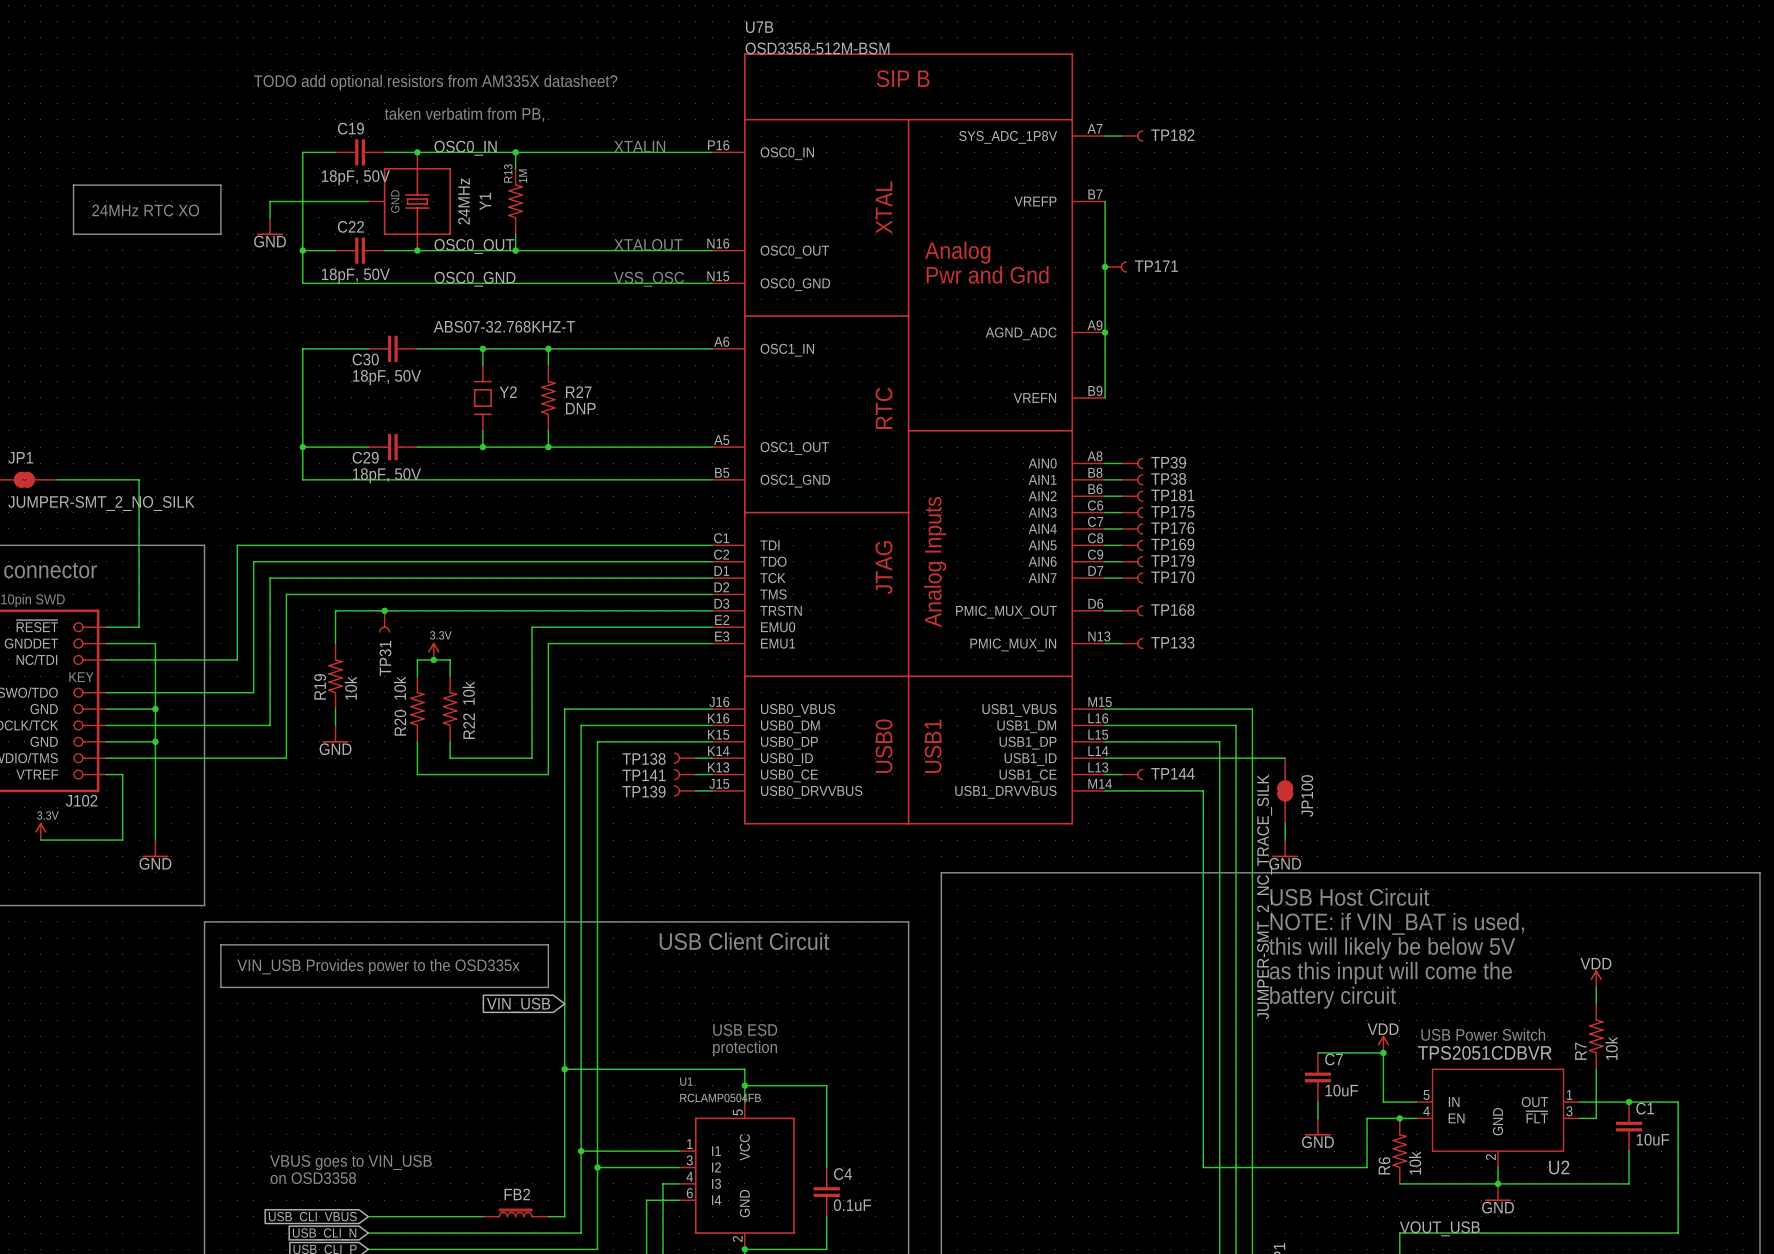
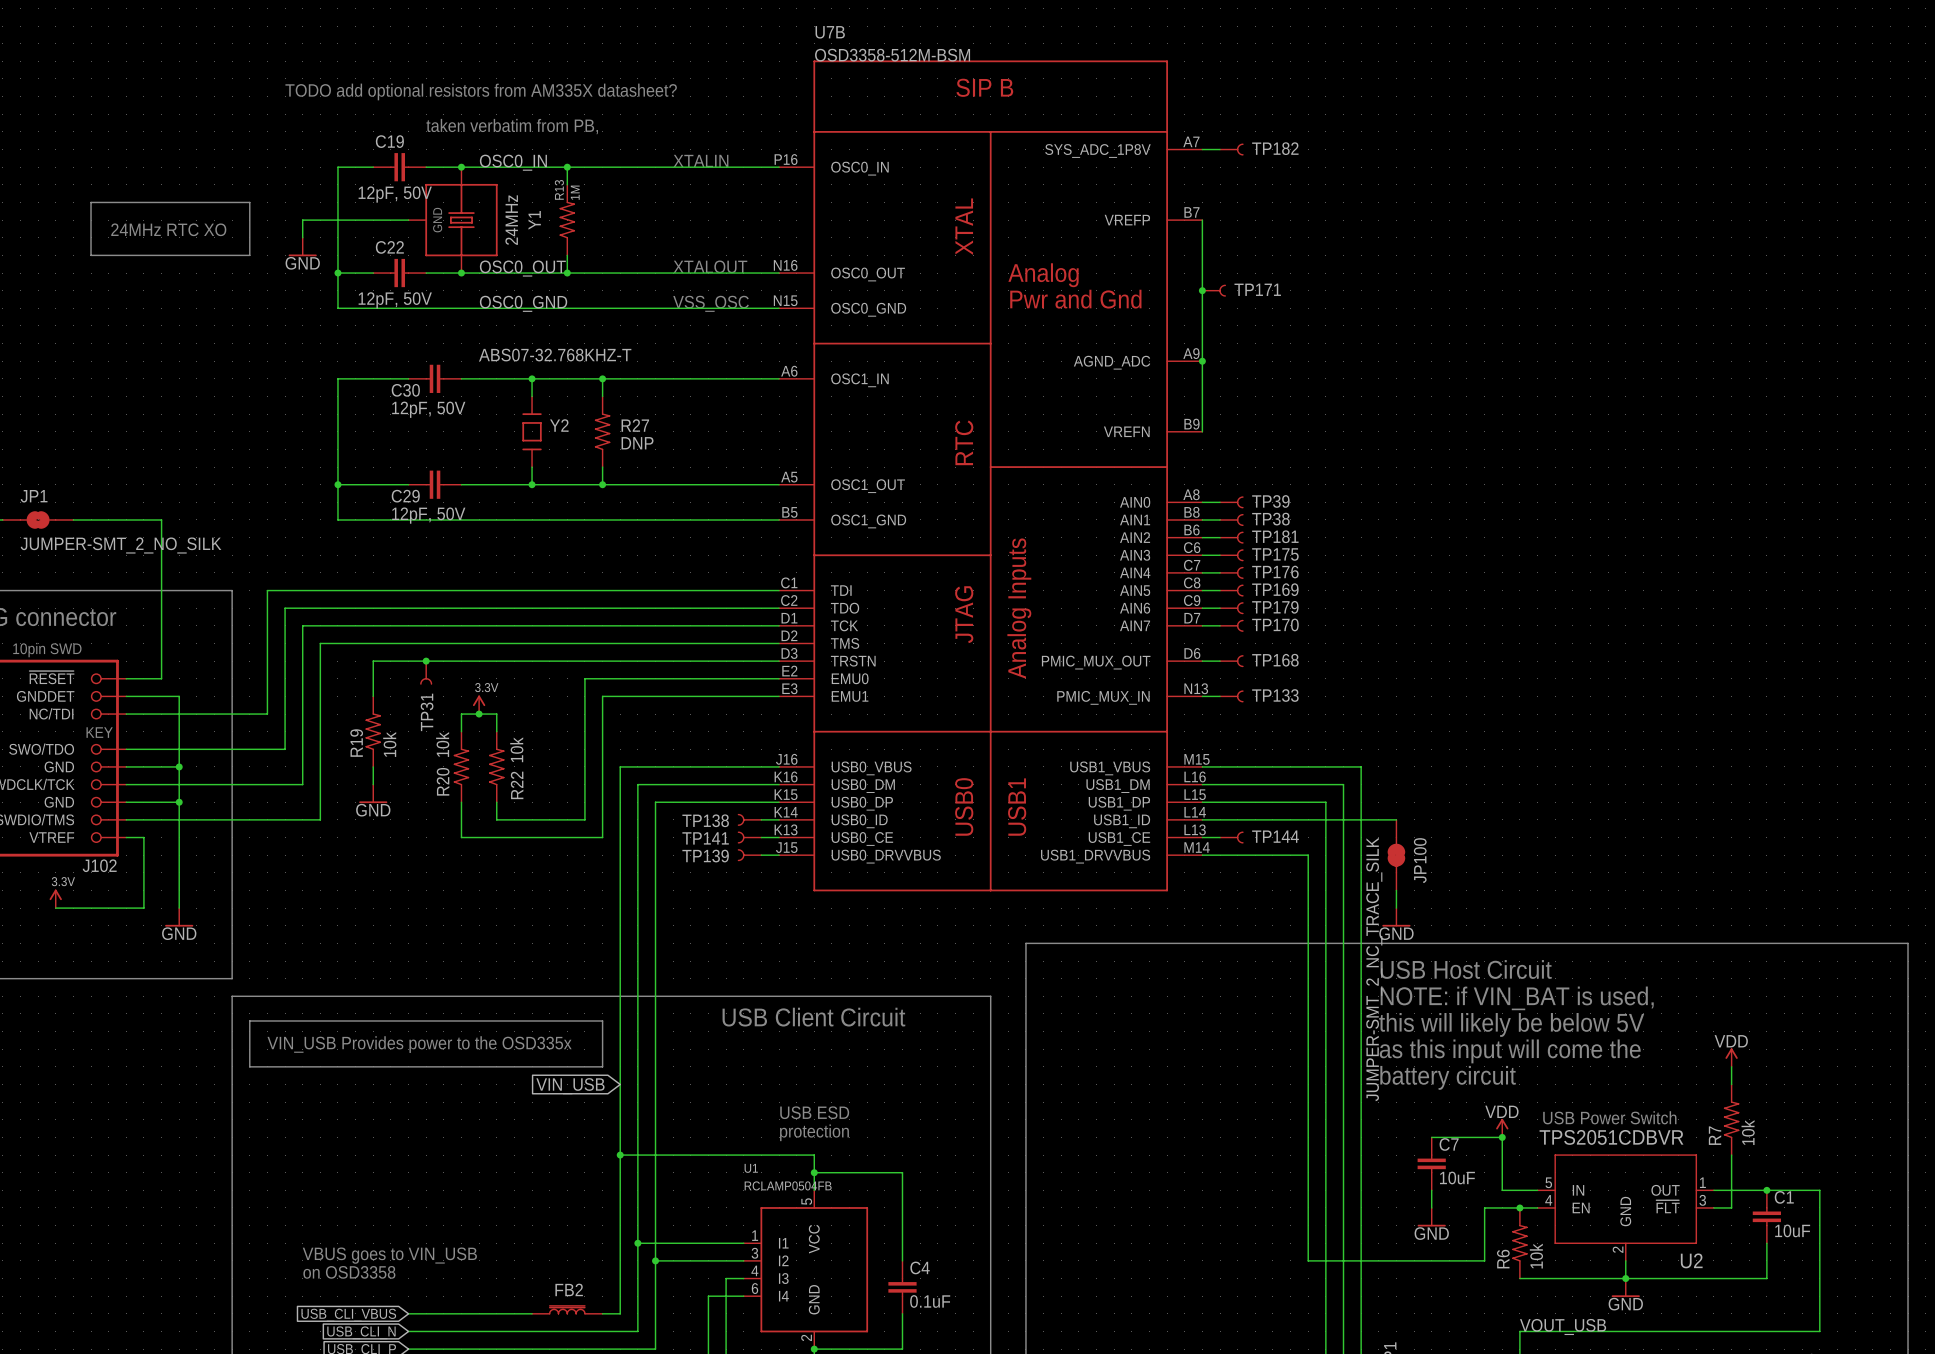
C19 value: 18pF, 50V (355, 177) -> 12pF, 50V (395, 194)
C22 value: 18pF, 50V (355, 276) -> 12pF, 50V (395, 300)
C30 value: 18pF, 50V (387, 377) -> 12pF, 50V (428, 409)
C29 value: 18pF, 50V (387, 475) -> 12pF, 50V (428, 515)

